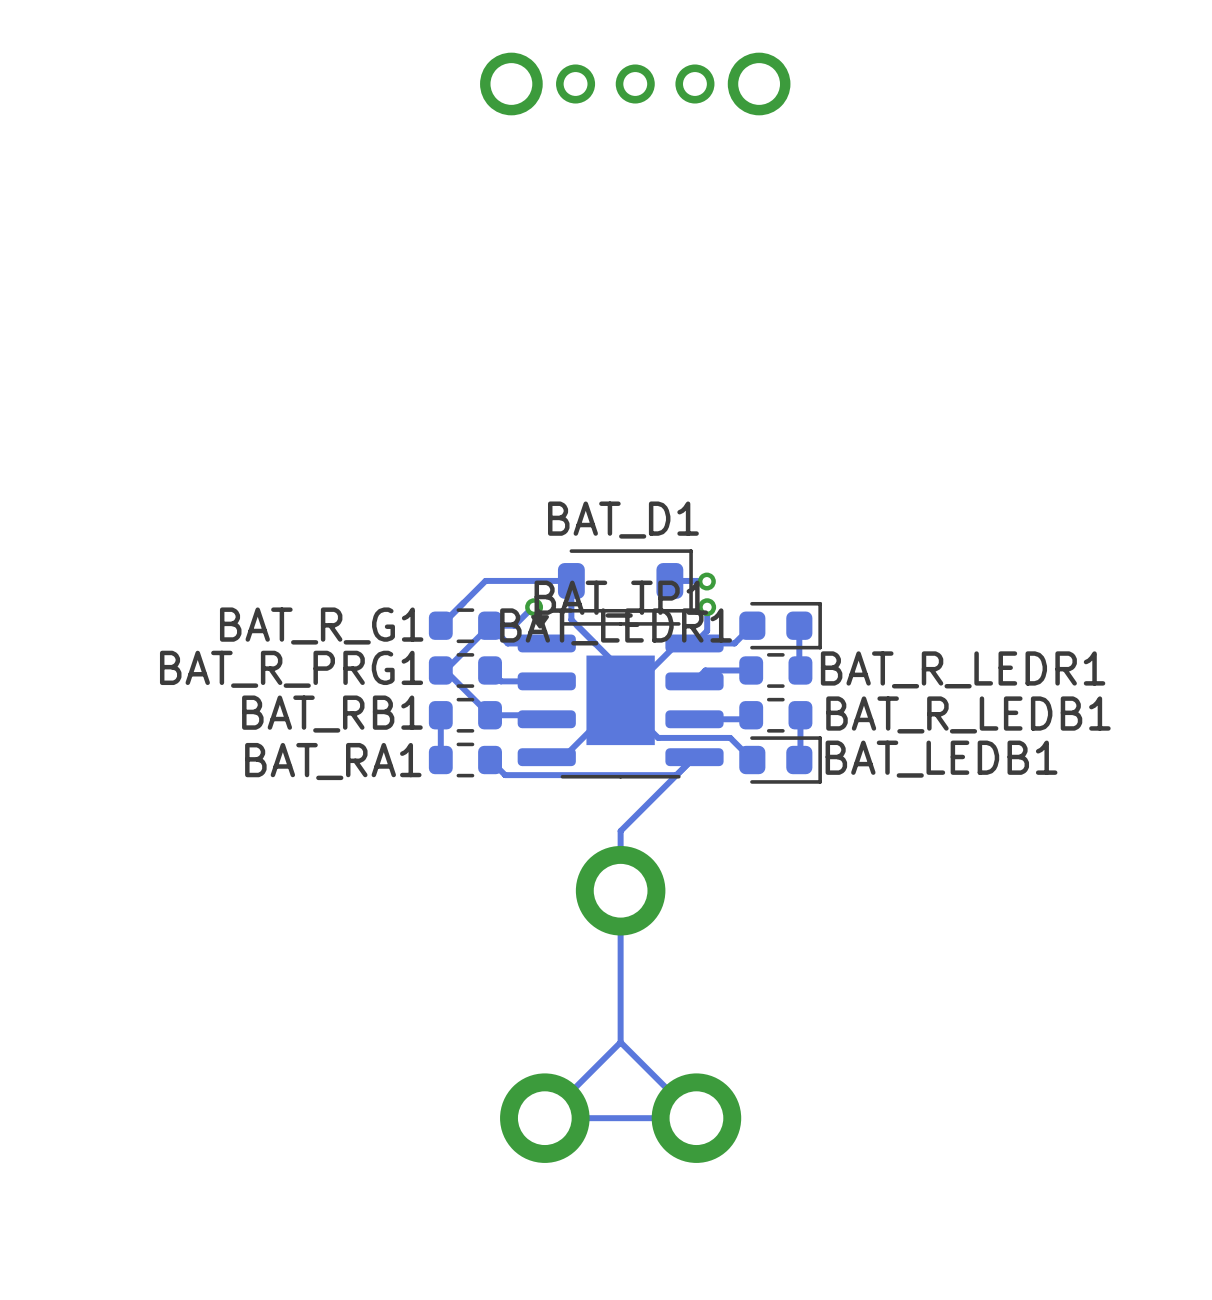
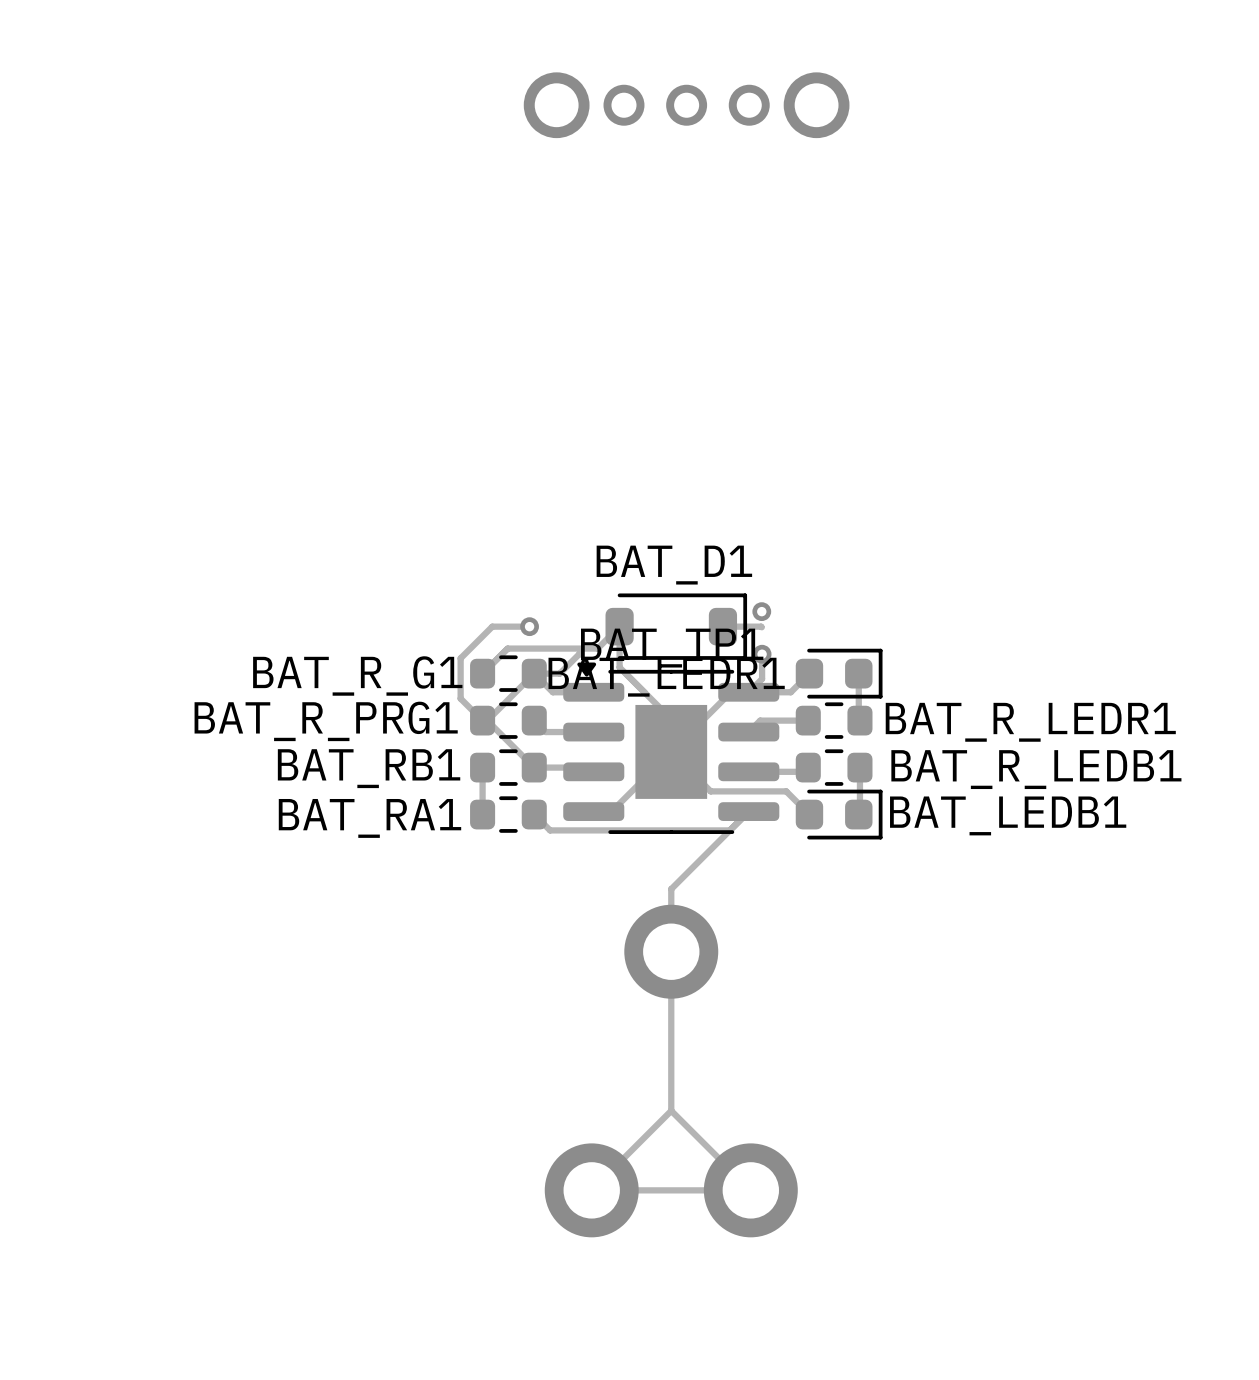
track: none -> (529, 626) (492, 626) (460, 658) (460, 698) (482, 720)
track: (571, 580) (485, 580) (464, 601) -> (619, 626) (597, 648) (507, 648)
via position: (706, 581) -> (761, 611)
via position: (534, 607) -> (529, 626)

